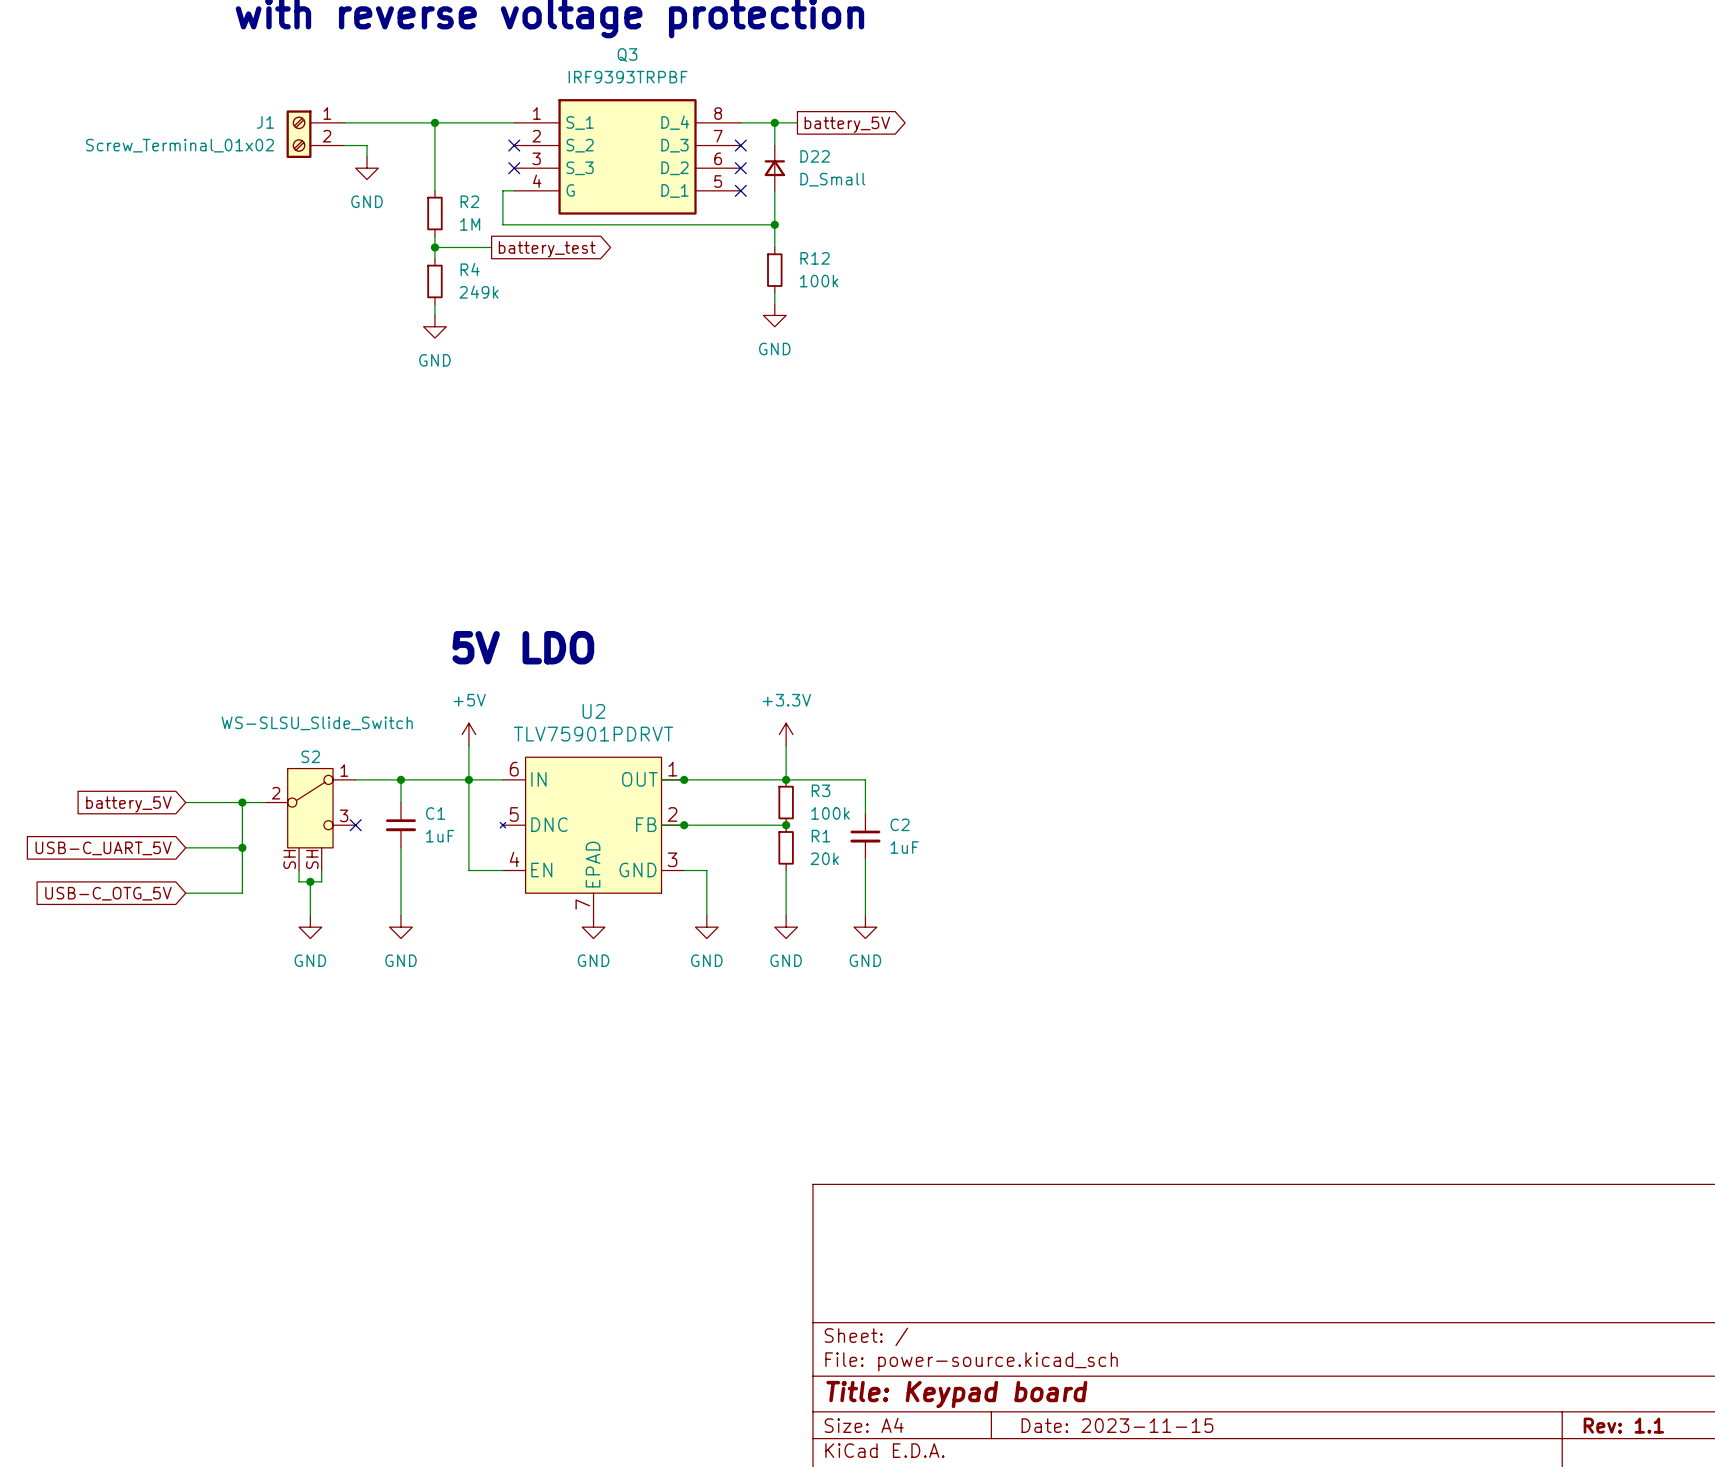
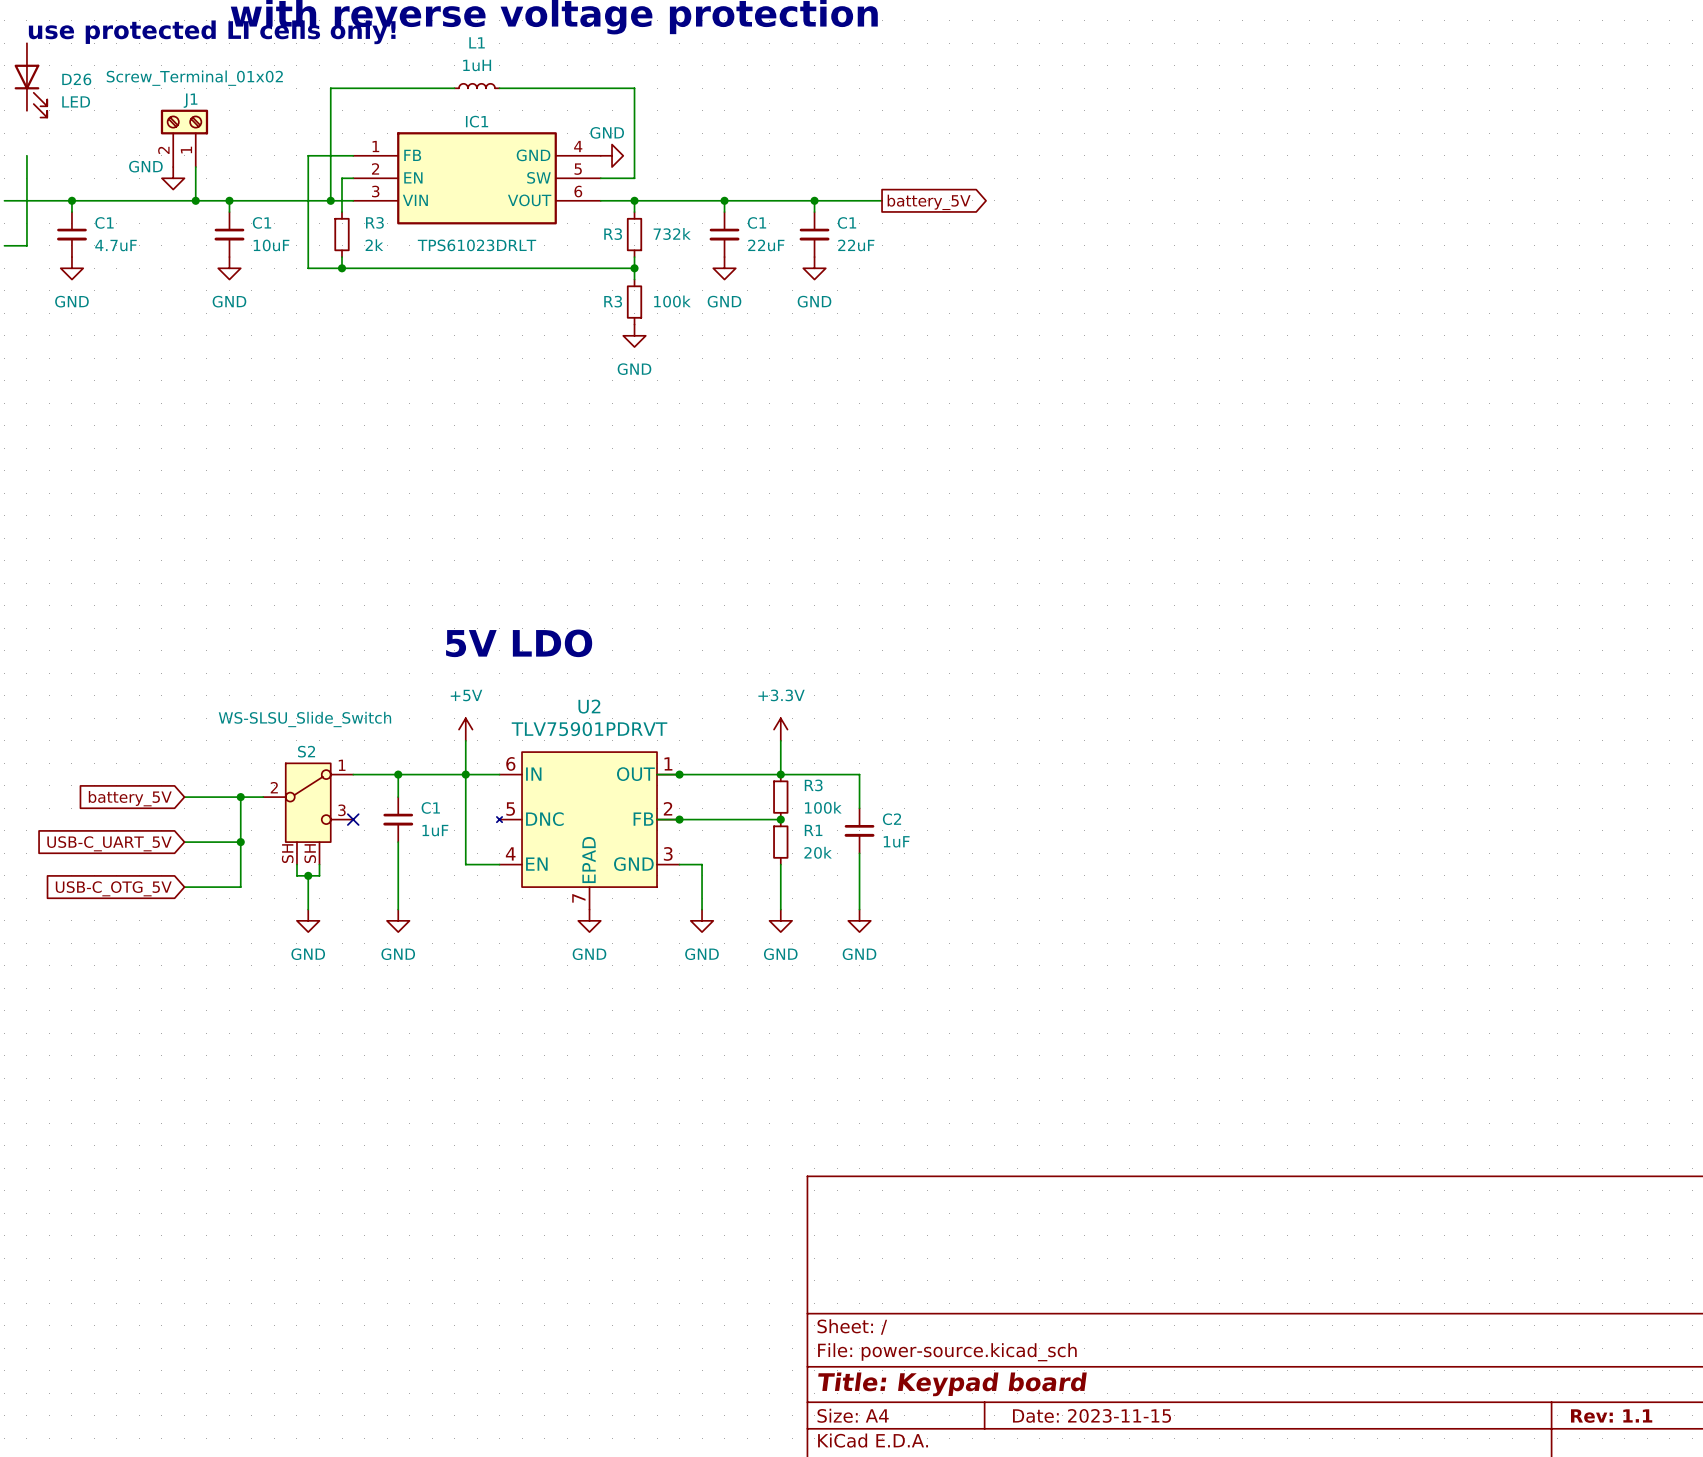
text: none -> use protected LI cells only! (212, 32)
D26: none -> LED (30, 80)
L1: none -> 1uH (477, 86)
wire: none -> (454, 88) (330, 88) (330, 200)
wire: none -> (499, 88) (634, 88) (634, 178) (600, 178)
wire: (344, 122) (514, 122) -> none
junction: (434, 122) -> none
wire: (740, 122) (797, 122) -> none
wire: (774, 122) (774, 145) -> (634, 257) (634, 279)
junction: (774, 122) -> none
global label position: battery_5V (847, 124) -> battery_5V (929, 202)
J1 rotation: 0° (299, 134) -> 90° clockwise (184, 122)
J1 position: (315, 134) -> (184, 138)
J1 value position: Screw_Terminal_01x02 (180, 145) -> Screw_Terminal_01x02 (194, 78)
wire: (344, 145) (366, 145) (366, 156) -> none
no-connect mark: (514, 145) -> none
no-connect mark: (740, 145) -> none
wire: none -> (26, 155) (26, 245) (4, 245)
wire: none -> (353, 155) (308, 155) (308, 268) (634, 268)
power symbol: none -> GND (612, 155)
Q3: IRF9393TRPBF (627, 156) -> none
wire: none -> (195, 167) (195, 200)
power symbol: GND (366, 168) -> none
no-connect mark: (514, 168) -> none
no-connect mark: (740, 168) -> none
D22: D_Small (774, 168) -> none
power symbol: none -> GND (173, 178)
wire: none -> (353, 178) (342, 178) (342, 212)
IC1: none -> TPS61023DRLT (477, 178)
wire: (514, 190) (502, 190) (502, 224) (774, 224) -> none
no-connect mark: (740, 190) -> none
wire: (774, 190) (774, 247) -> none
wire: none -> (4, 200) (353, 200)
wire: none -> (71, 200) (71, 212)
junction: none -> (71, 200)
junction: none -> (195, 200)
wire: none -> (229, 200) (229, 212)
junction: none -> (229, 200)
junction: none -> (330, 200)
wire: none -> (600, 200) (882, 200)
junction: none -> (634, 200)
junction: none -> (724, 200)
wire: none -> (814, 200) (814, 212)
junction: none -> (814, 200)
R2: 1M (434, 213) -> none
junction: (774, 224) -> none
C1: none -> 4.7uF (71, 234)
C1: none -> 10uF (229, 234)
R3: none -> 2k (342, 234)
wire: (434, 236) (434, 258) -> none
R3: none -> 732k (634, 234)
C1: none -> 22uF (724, 234)
C1: none -> 22uF (814, 234)
wire: (434, 247) (491, 247) -> none
junction: (434, 247) -> none
global label: battery_test (547, 249) -> none
power symbol: none -> GND (71, 268)
power symbol: none -> GND (229, 268)
junction: none -> (342, 268)
junction: none -> (634, 268)
power symbol: none -> GND (724, 268)
R12: 100k (774, 270) -> none
power symbol: none -> GND (814, 268)
R4: 249k (434, 281) -> none
wire: (774, 292) (774, 304) -> (724, 200) (724, 212)
wire: (434, 304) (434, 315) -> (342, 257) (342, 268)
R3: none -> 100k (634, 302)
power symbol: GND (774, 315) -> none
power symbol: GND (434, 326) -> none
power symbol: none -> GND (634, 335)

